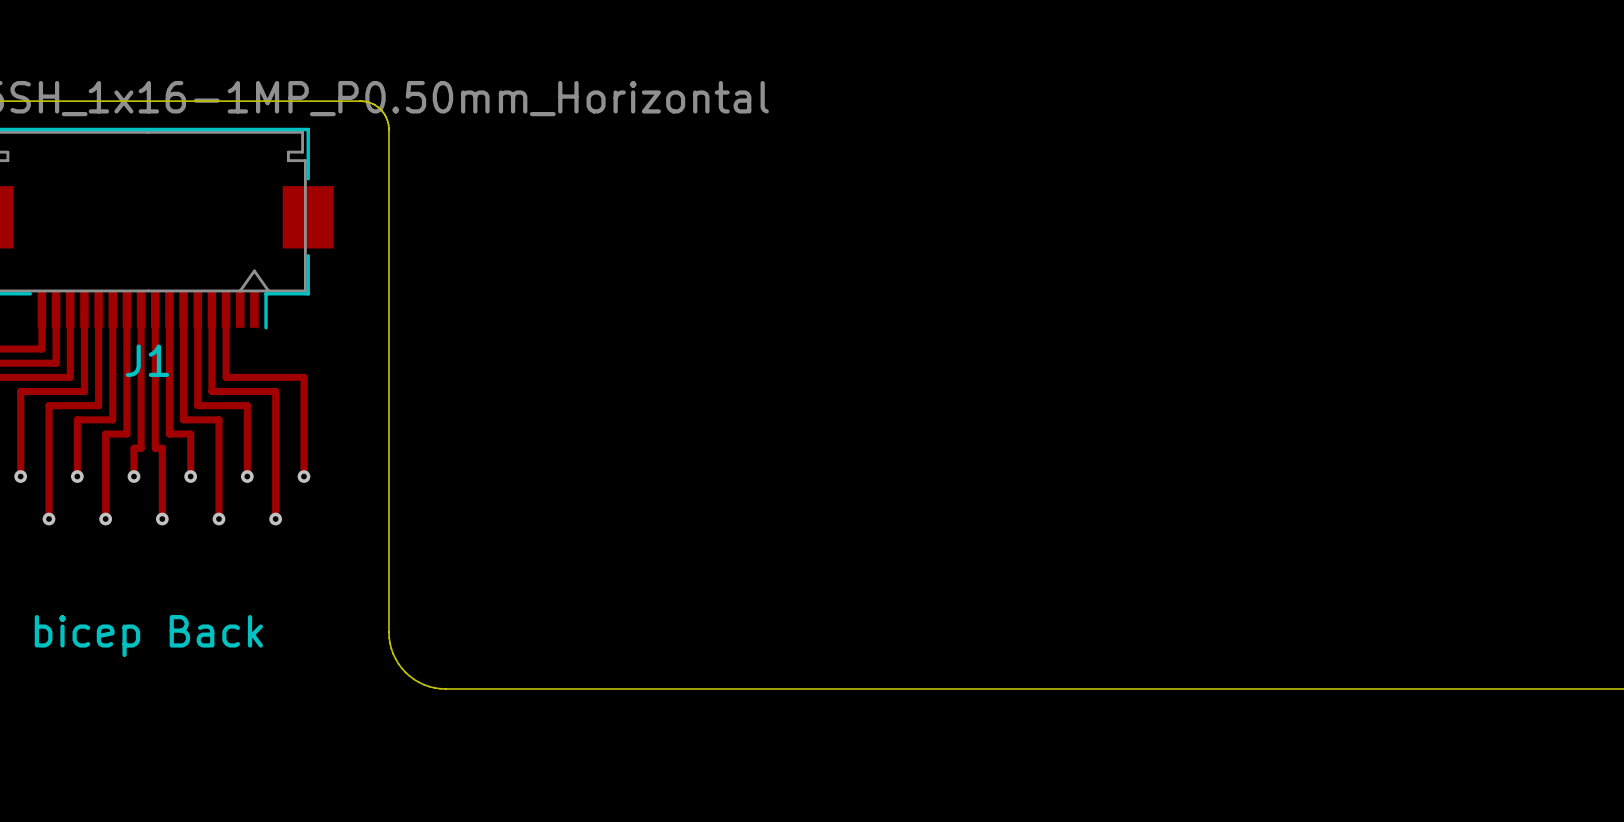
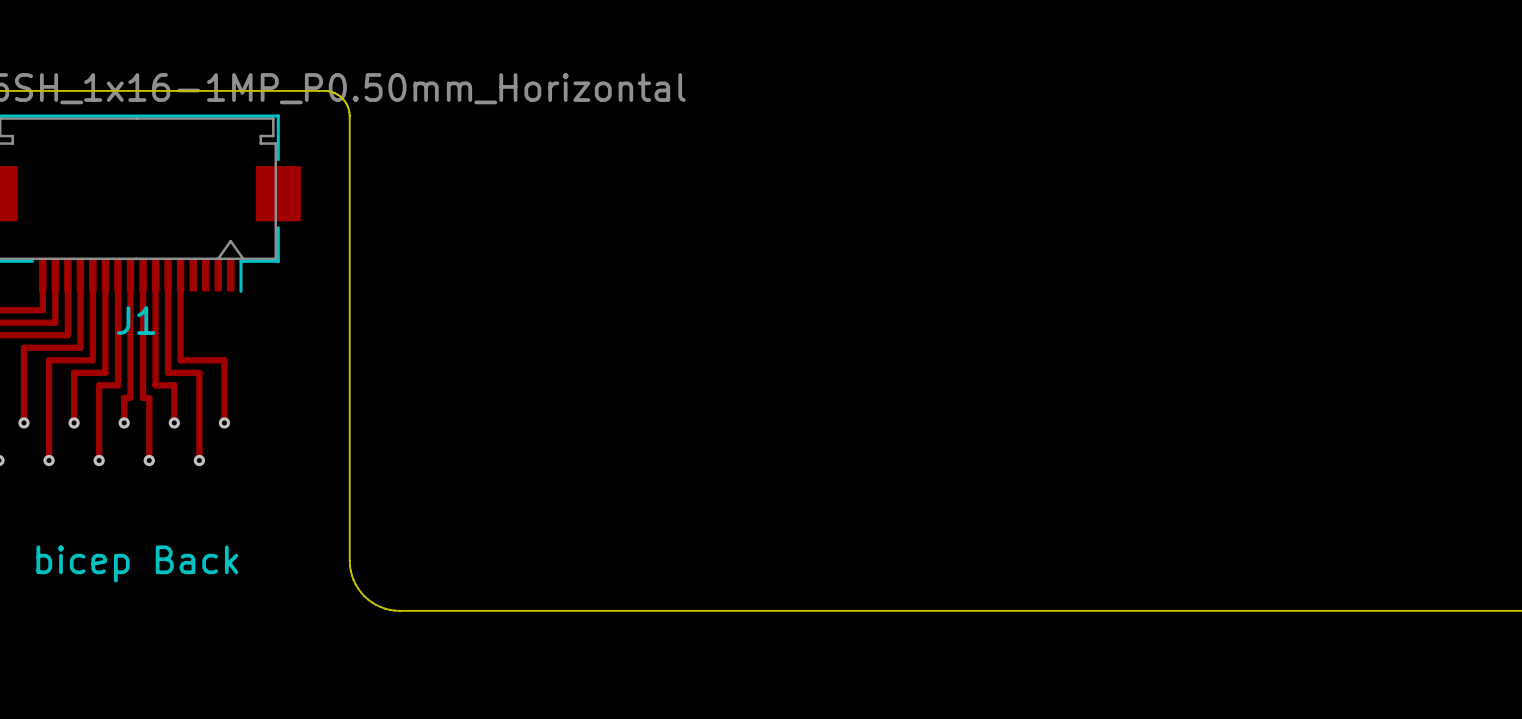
track: (211, 309) (211, 391) (275, 391) (275, 519) -> none
track: (226, 309) (226, 377) (303, 377) (303, 476) -> none
via: (303, 476) -> none
via: (275, 519) -> none

